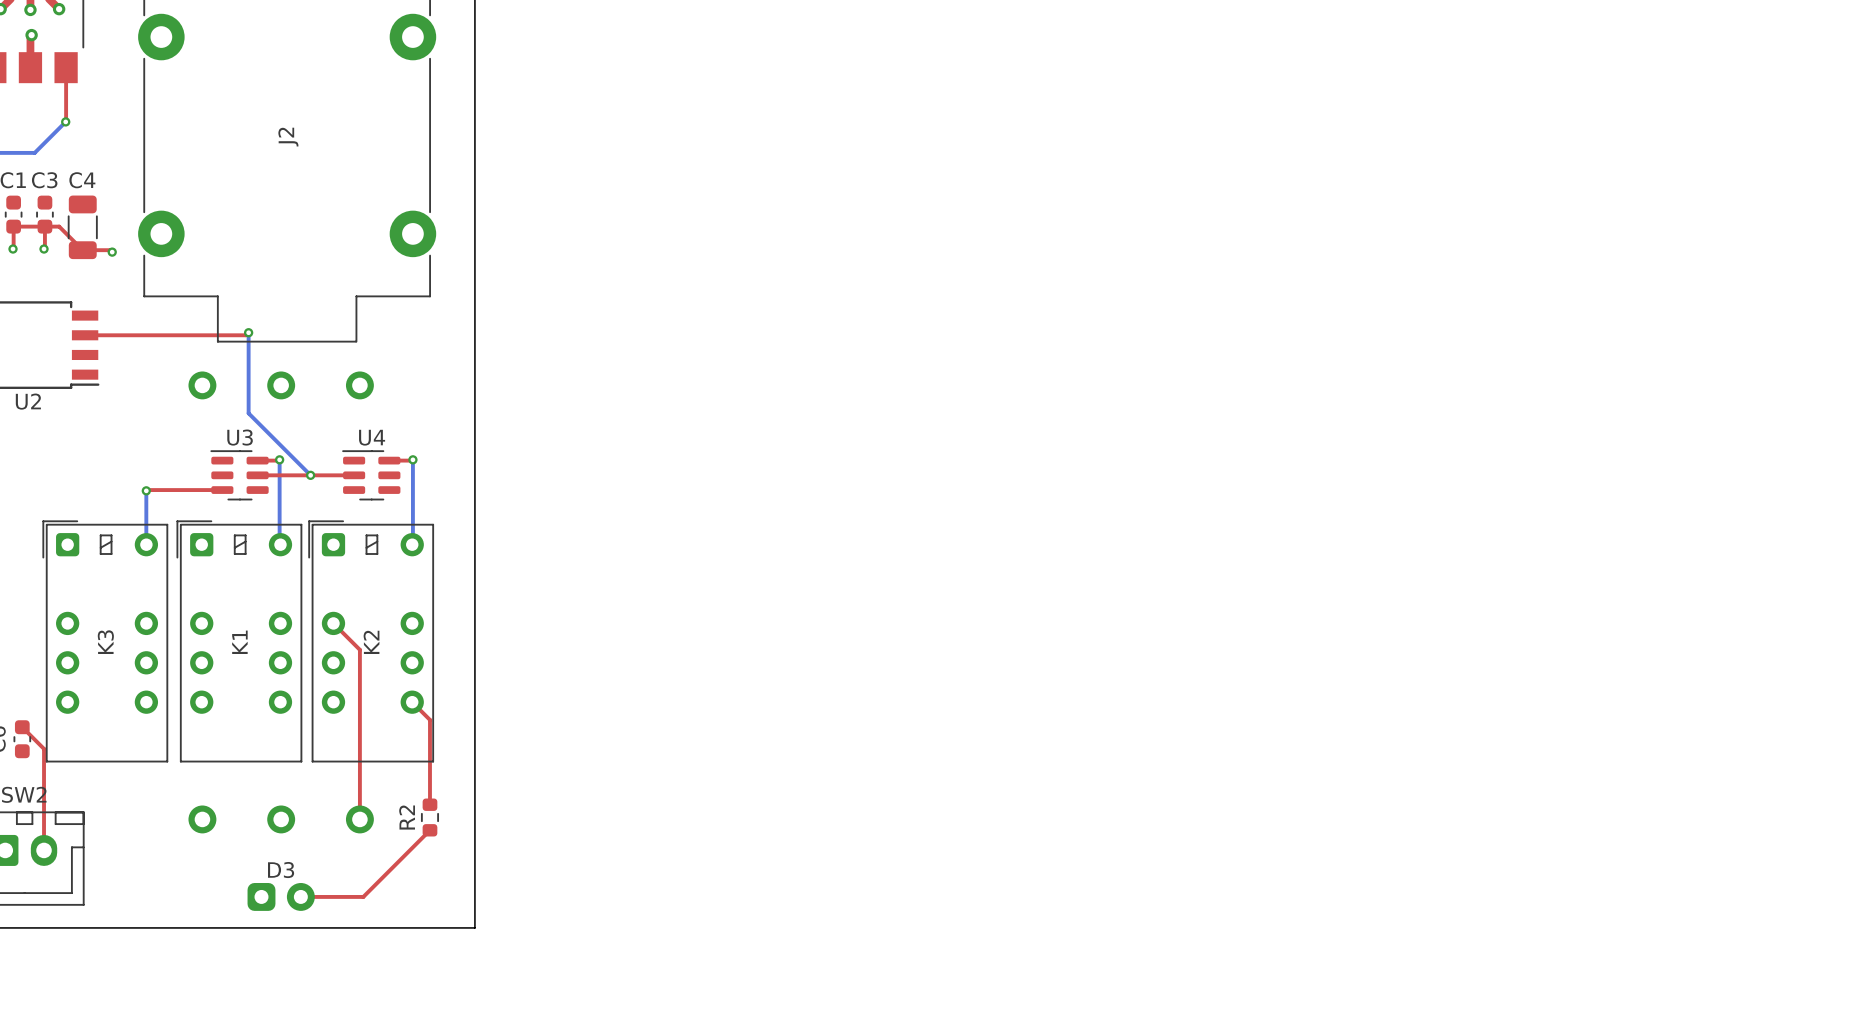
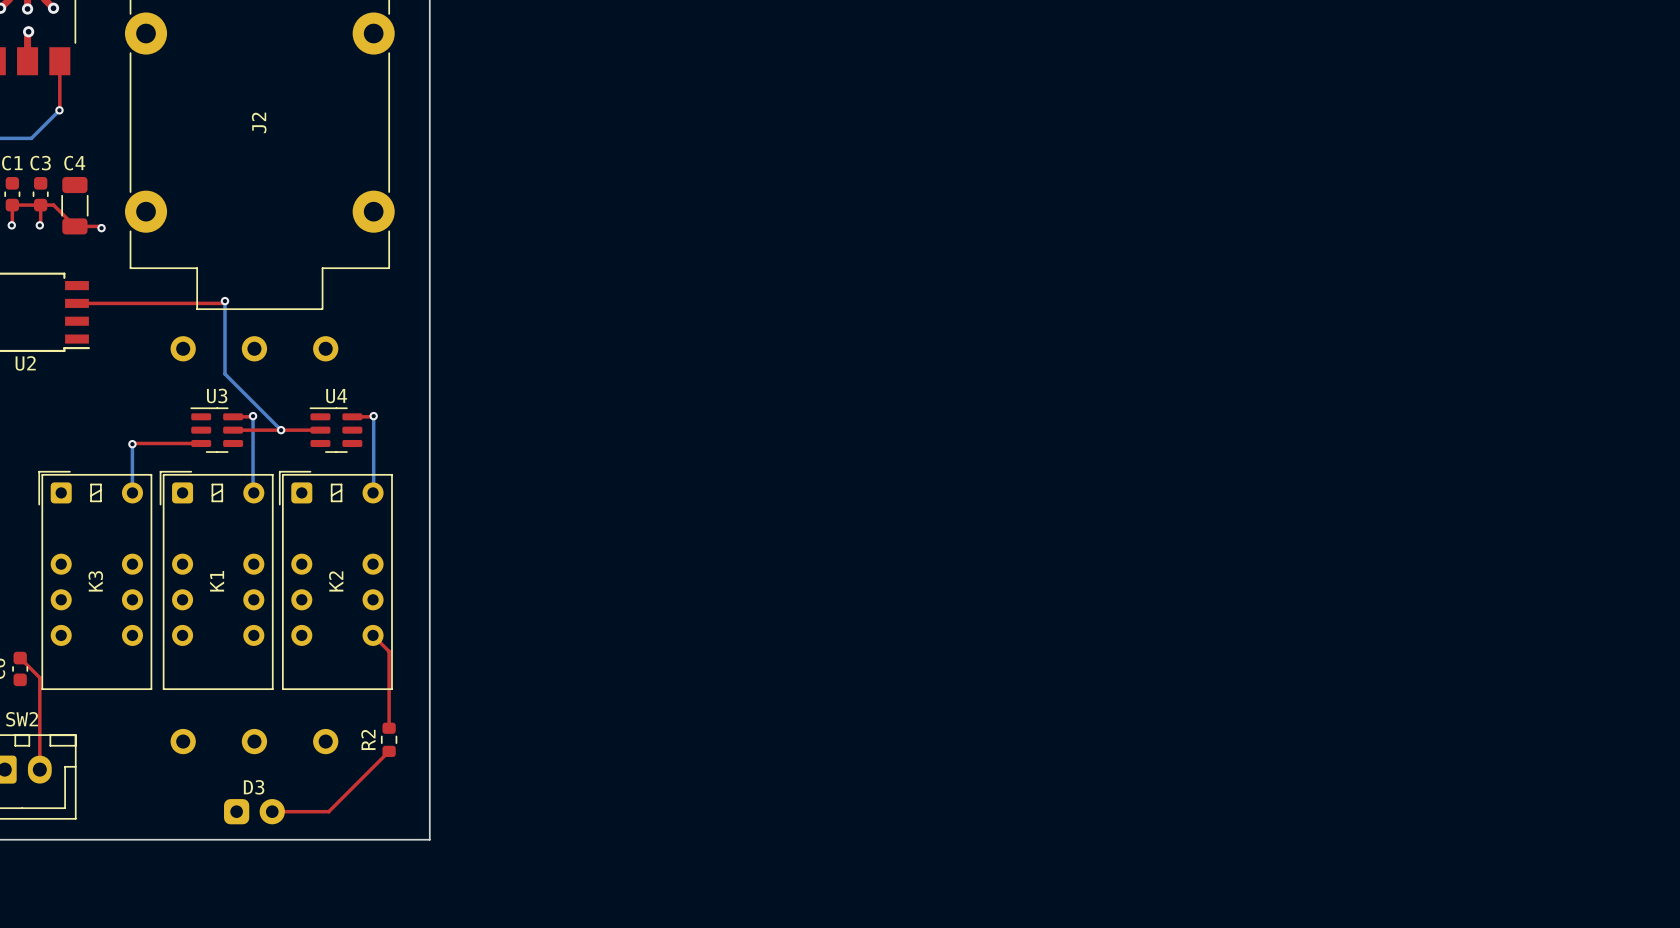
top track: (333, 623) (359, 649) (359, 819) -> none

